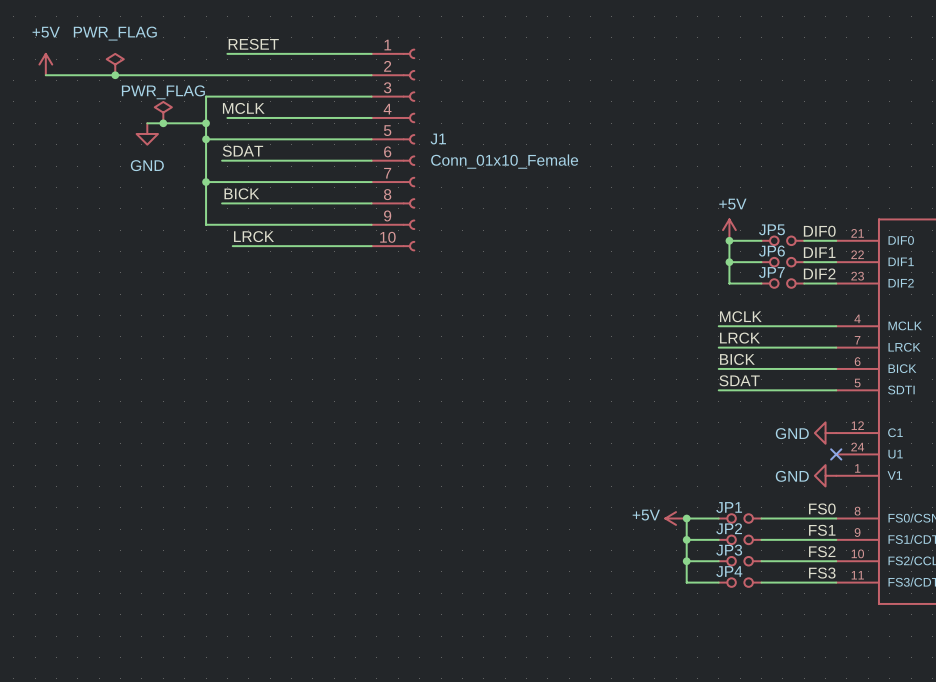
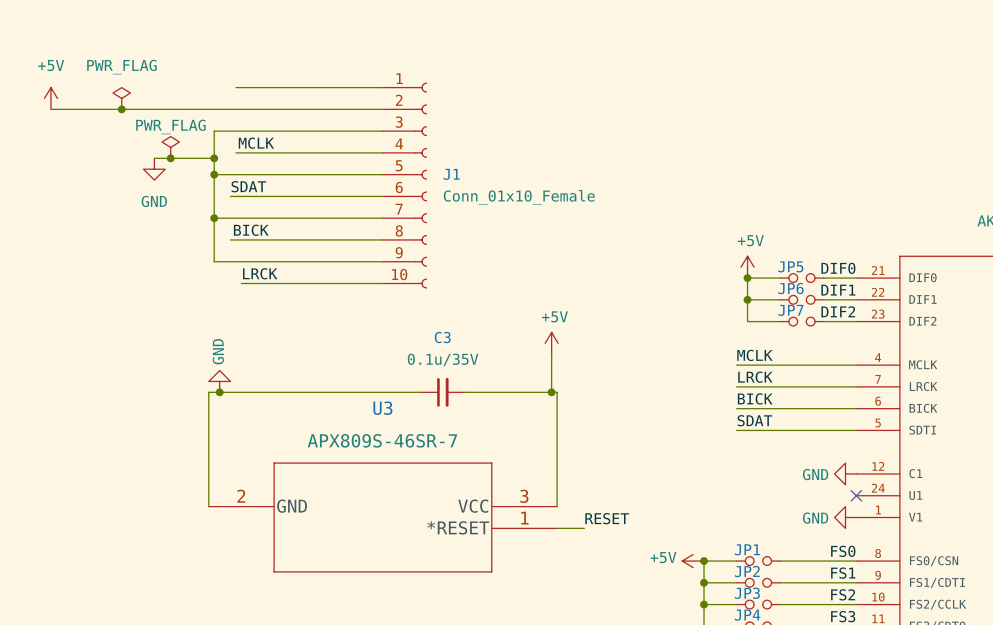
label: RESET (253, 44) -> none
power symbol: none -> +5V (551, 343)
wire: none -> (551, 354) (551, 392)
power symbol: none -> GND (219, 381)
junction: none -> (219, 392)
wire: none -> (421, 392) (208, 392) (208, 506)
C3: none -> 0.1u/35V (442, 392)
wire: none -> (464, 392) (557, 392) (557, 506)
junction: none -> (551, 392)
U3: none -> APX809S-46SR-7 (382, 517)
label: none -> RESET (607, 518)
wire: none -> (557, 528) (584, 528)

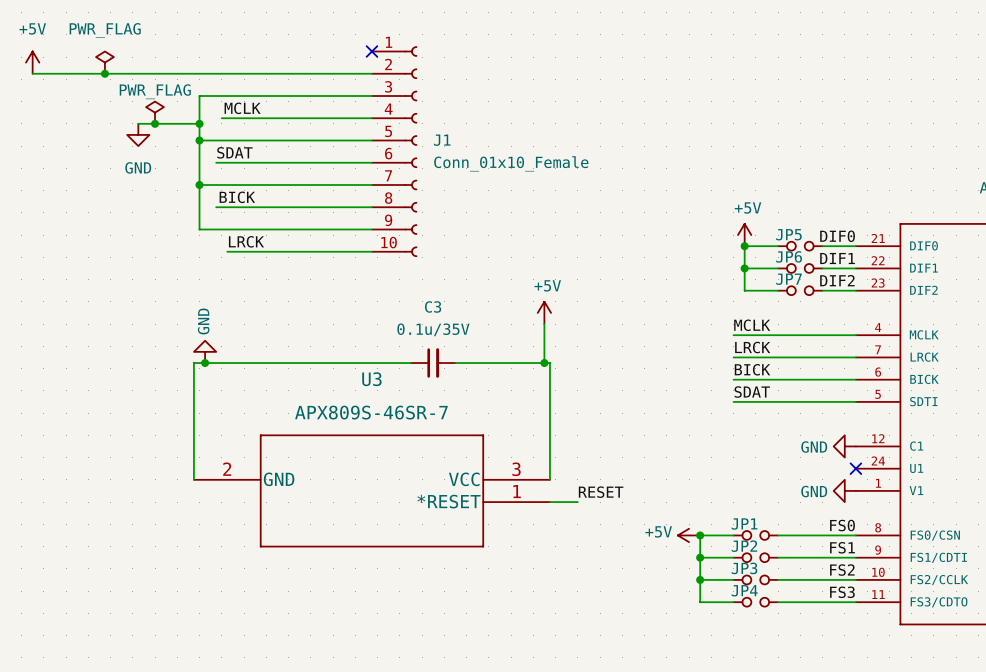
wire: (236, 87) (382, 87) -> none
no-connect mark: none -> (371, 51)

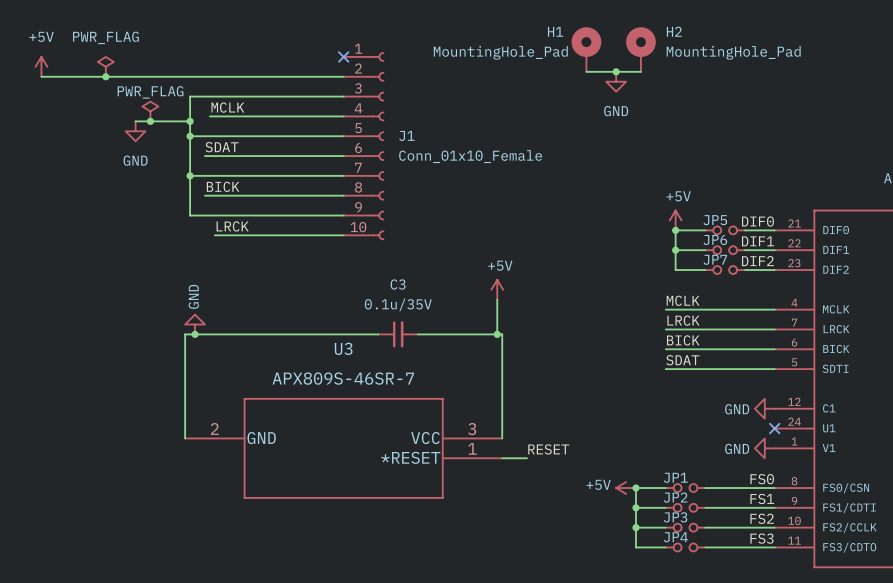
H1: none -> MountingHole_Pad (586, 49)
H2: none -> MountingHole_Pad (640, 49)
wire: none -> (586, 71) (640, 71)
junction: none -> (616, 71)
power symbol: none -> GND (616, 81)

